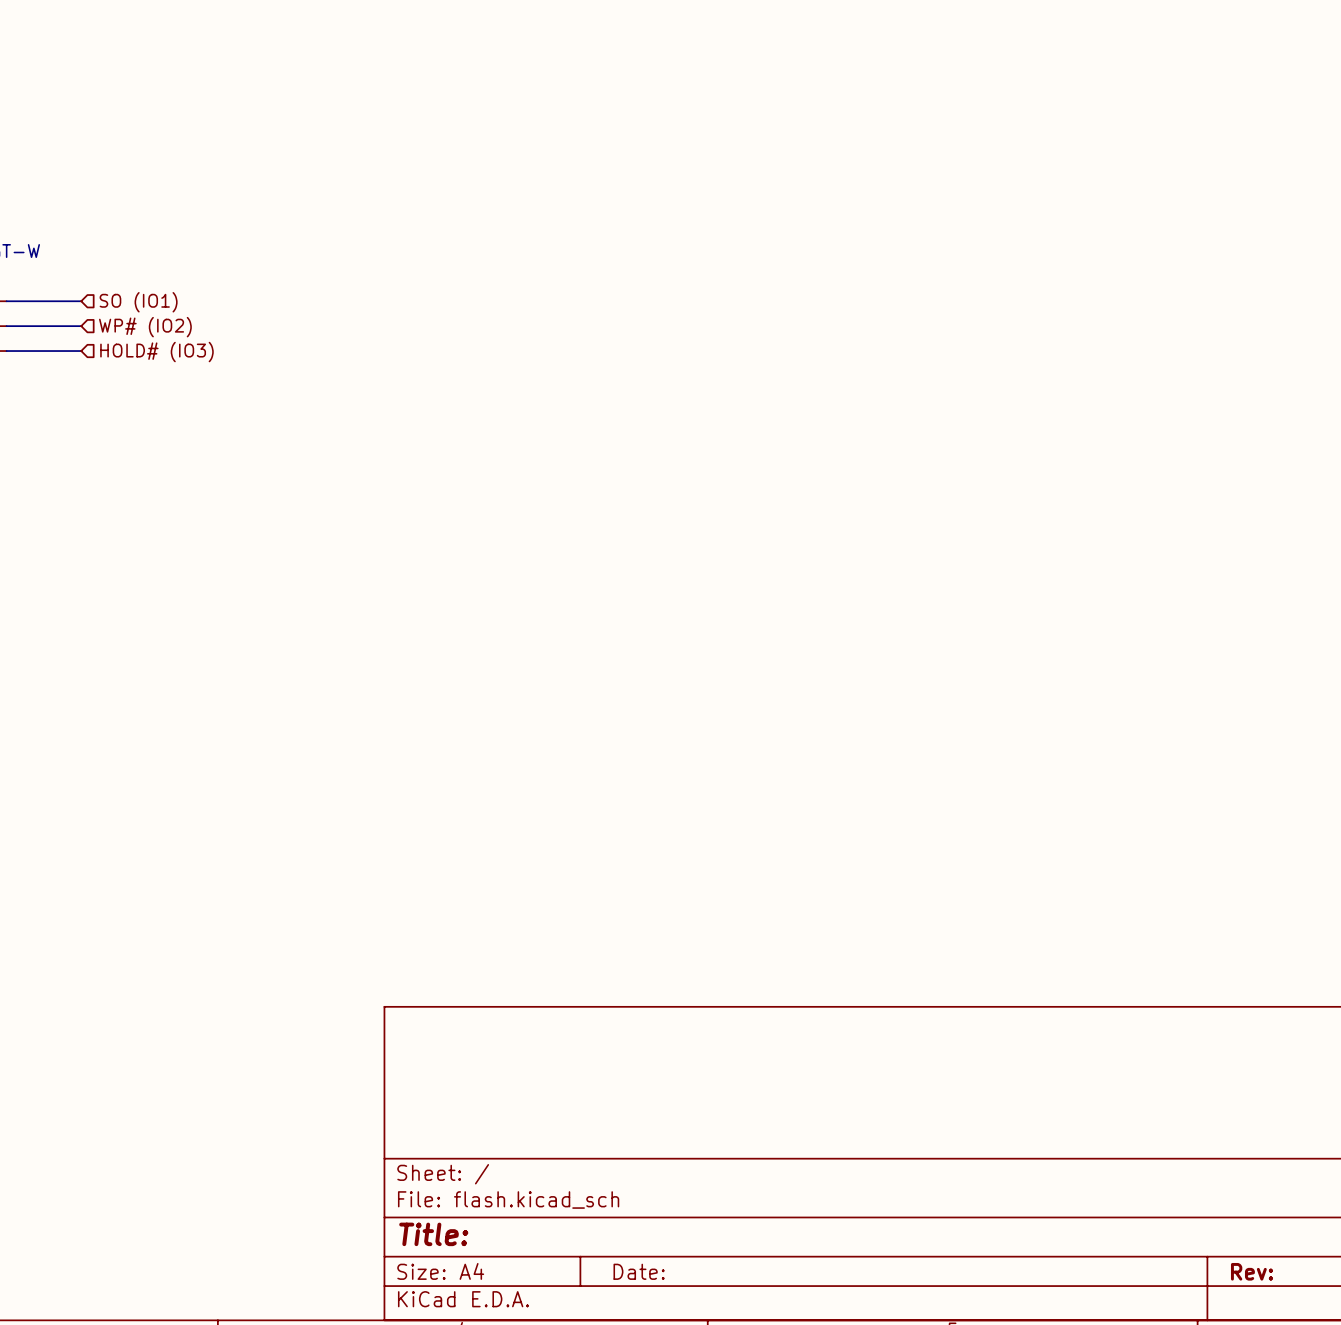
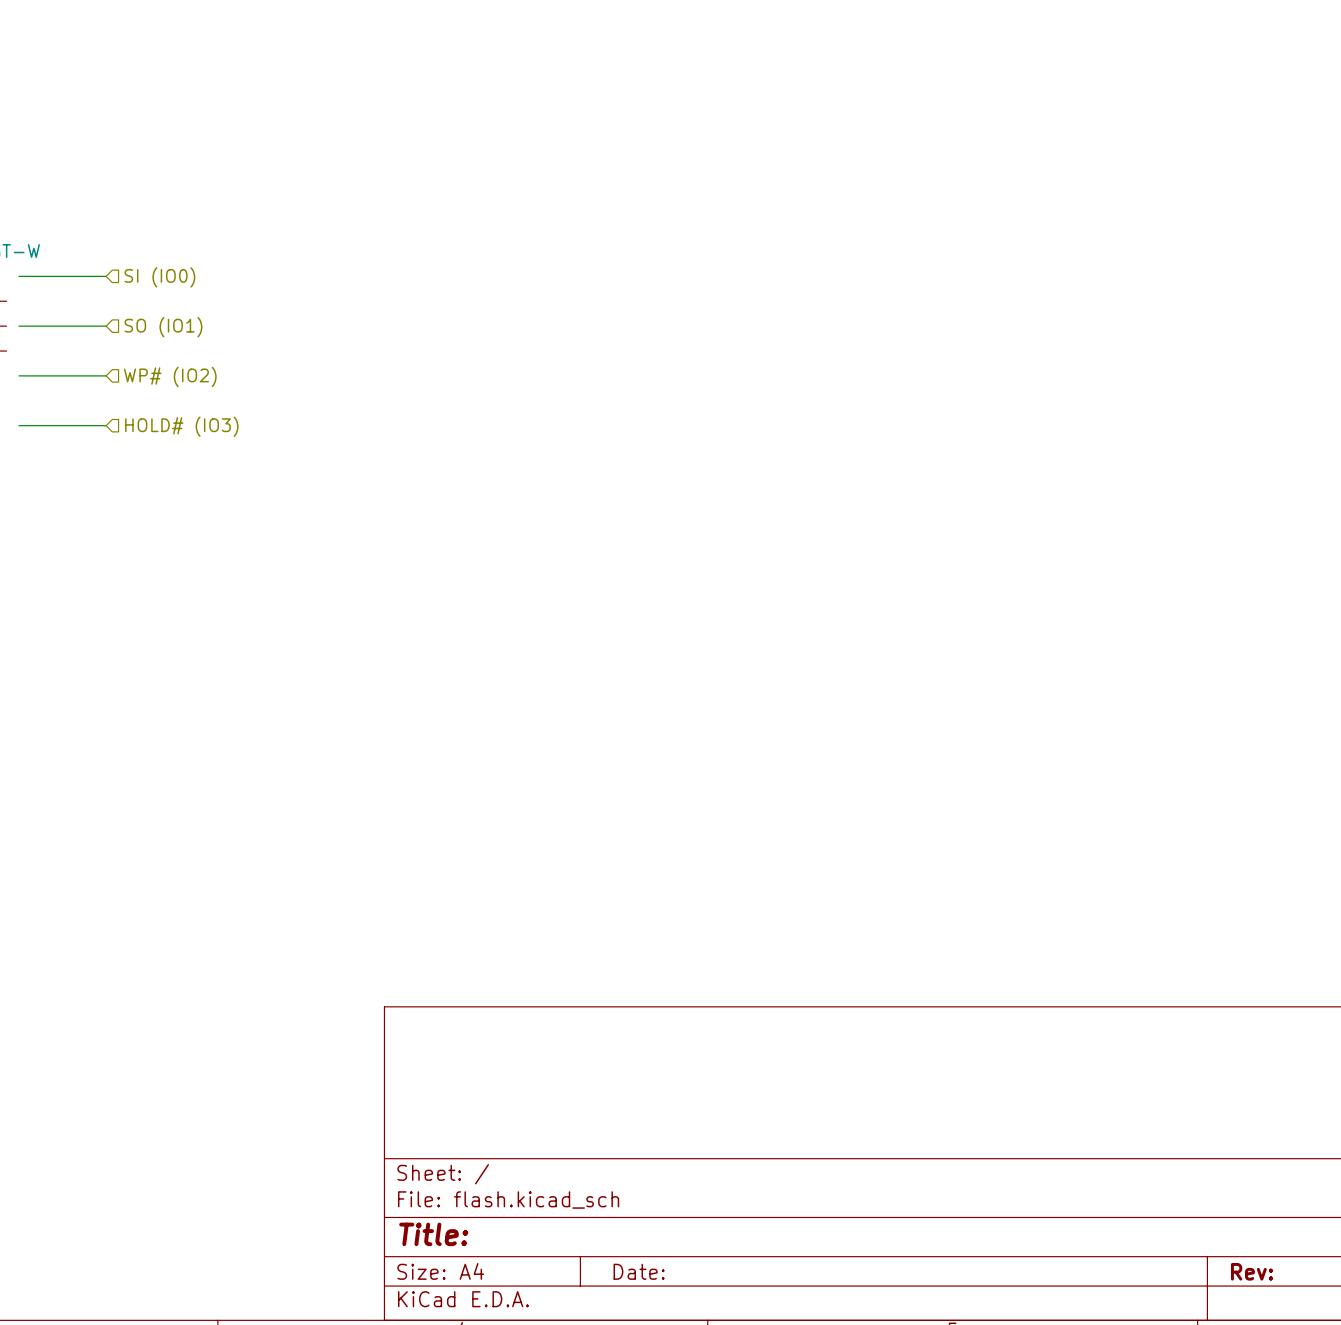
wire: none -> (19, 276) (106, 276)
hierarchical label: none -> SI (IO0) (159, 277)
wire: (6, 301) (81, 301) -> none
hierarchical label position: SO (IO1) (138, 302) -> SO (IO1) (163, 327)
wire: (6, 326) (19, 326) -> none
wire: none -> (81, 326) (106, 326)
hierarchical label position: WP# (IO2) (145, 327) -> WP# (IO2) (170, 376)
wire: (6, 351) (81, 351) -> none
hierarchical label position: HOLD# (IO3) (156, 352) -> HOLD# (IO3) (181, 426)
wire: none -> (19, 375) (106, 375)
wire: none -> (19, 425) (106, 425)

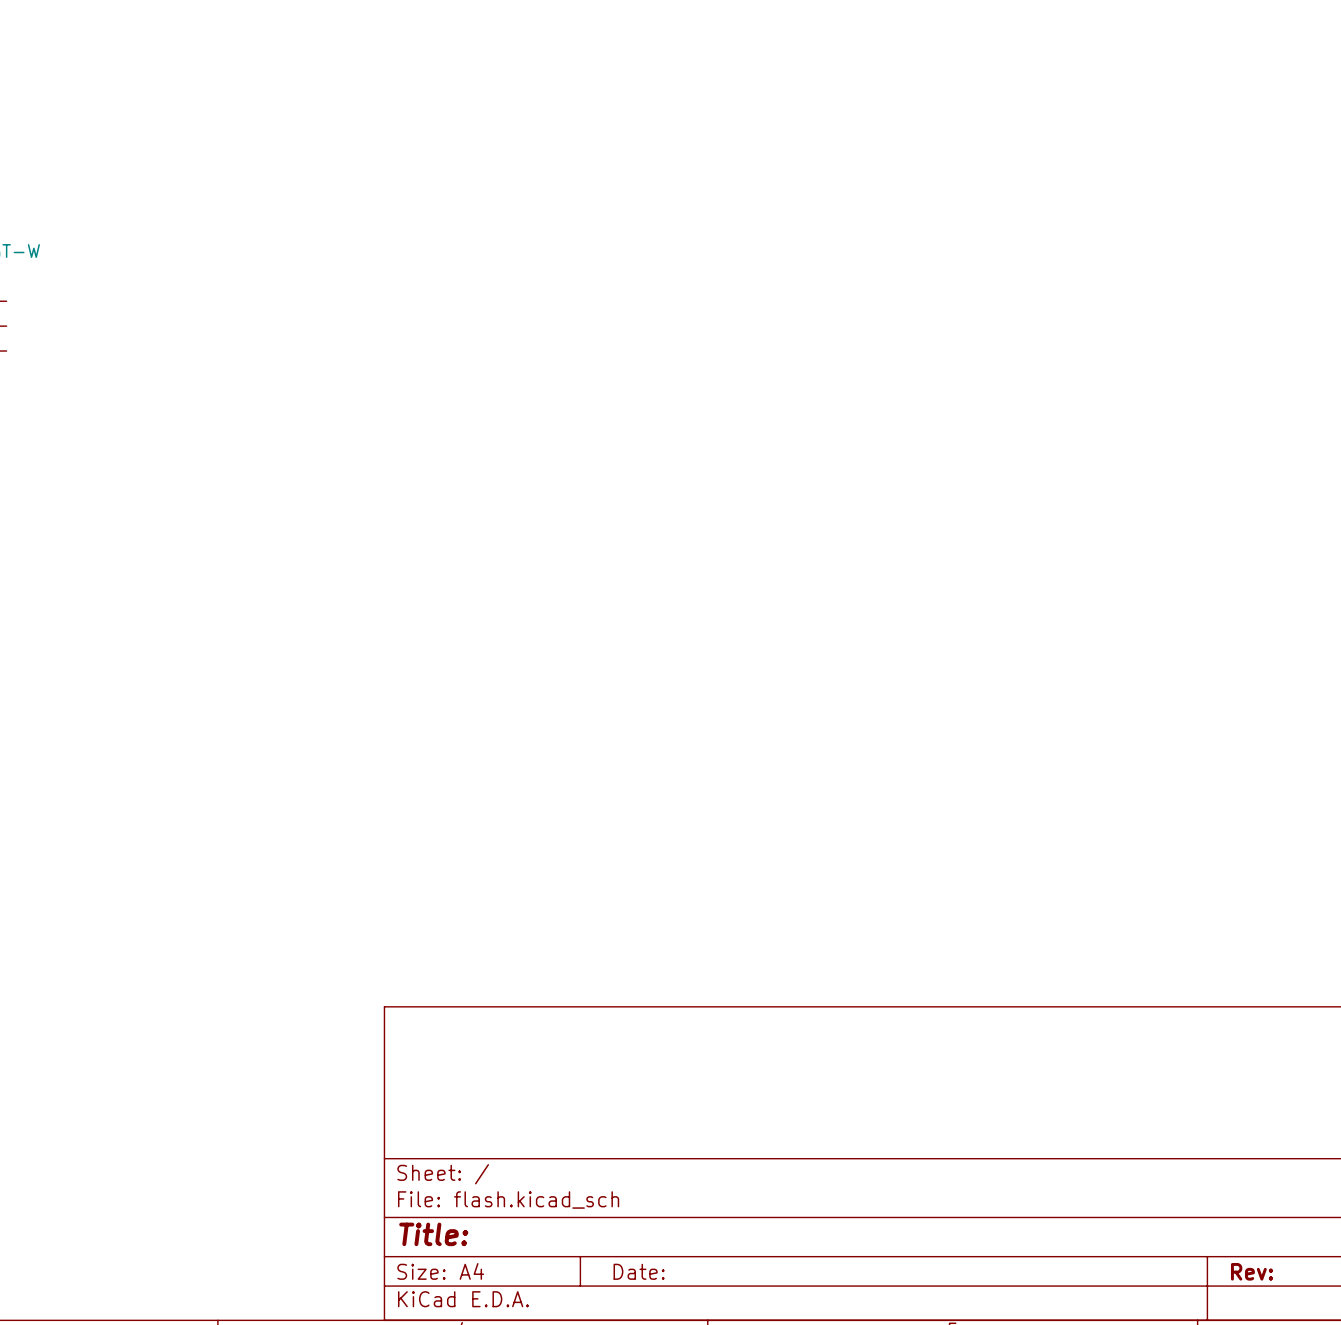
wire: (19, 276) (106, 276) -> none
hierarchical label: SI (IO0) (159, 277) -> none
wire: (19, 326) (106, 326) -> none
hierarchical label: SO (IO1) (163, 327) -> none
wire: (19, 375) (106, 375) -> none
hierarchical label: WP# (IO2) (170, 376) -> none
wire: (19, 425) (106, 425) -> none
hierarchical label: HOLD# (IO3) (181, 426) -> none

